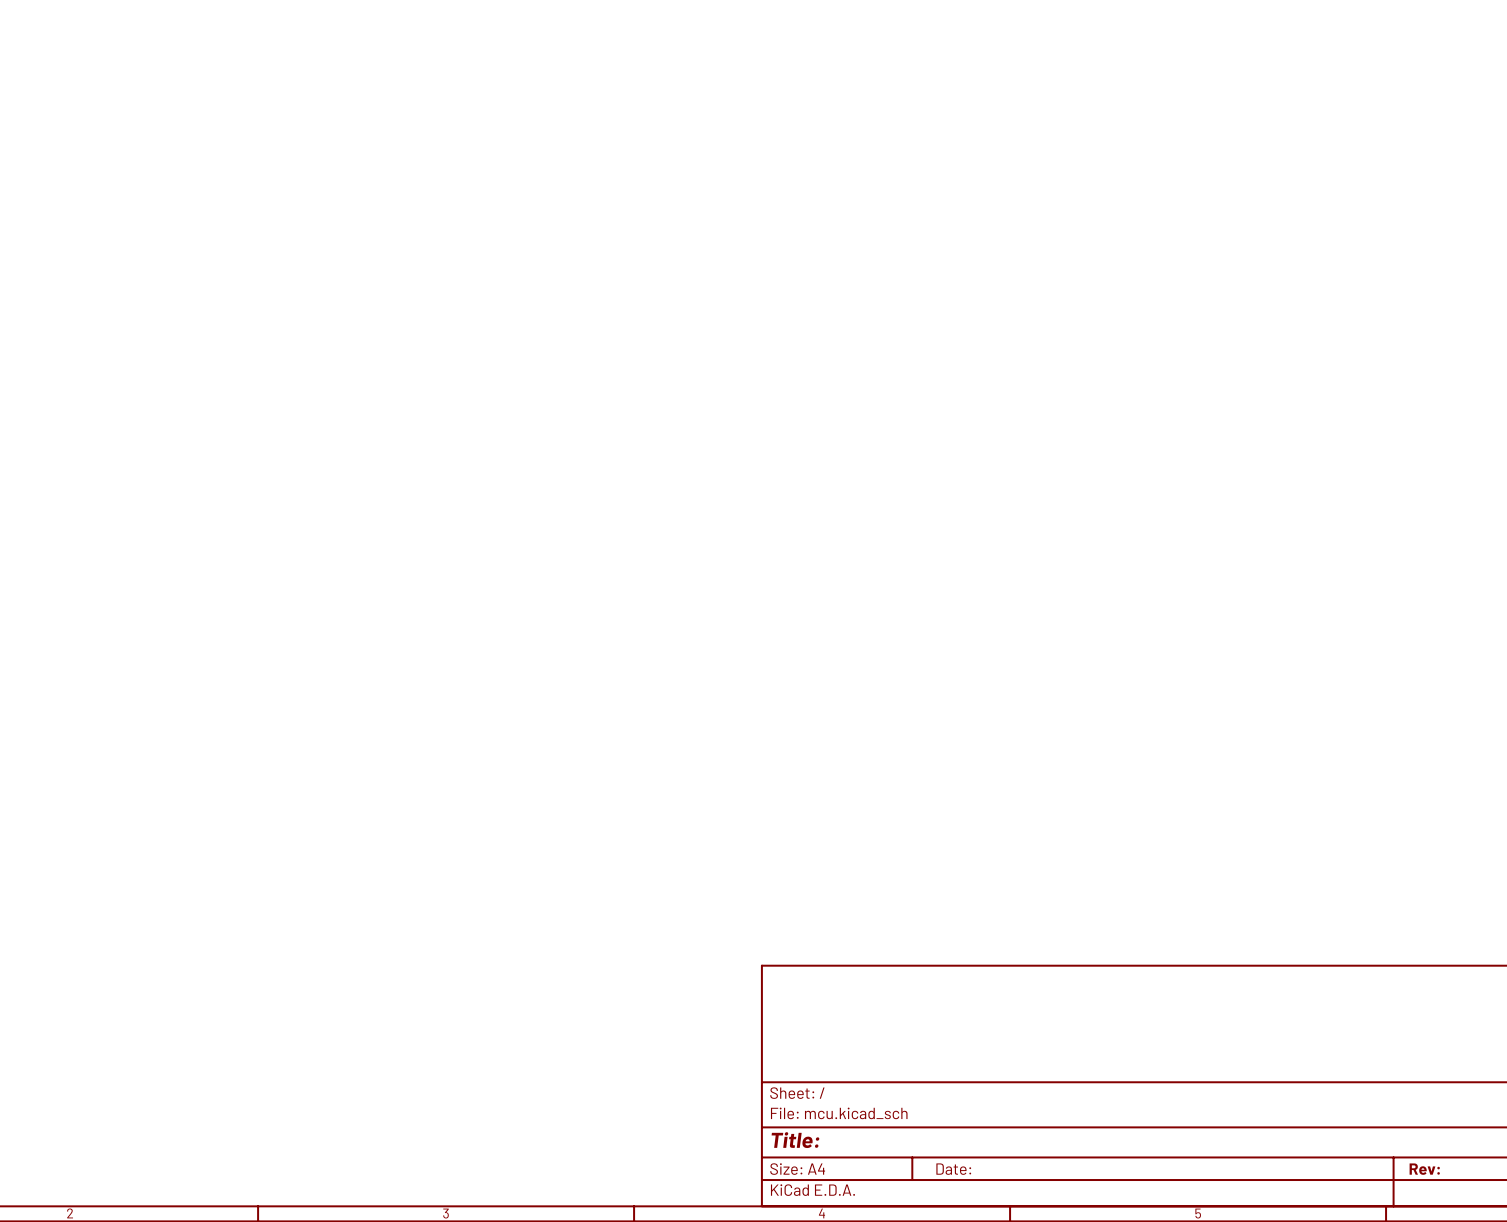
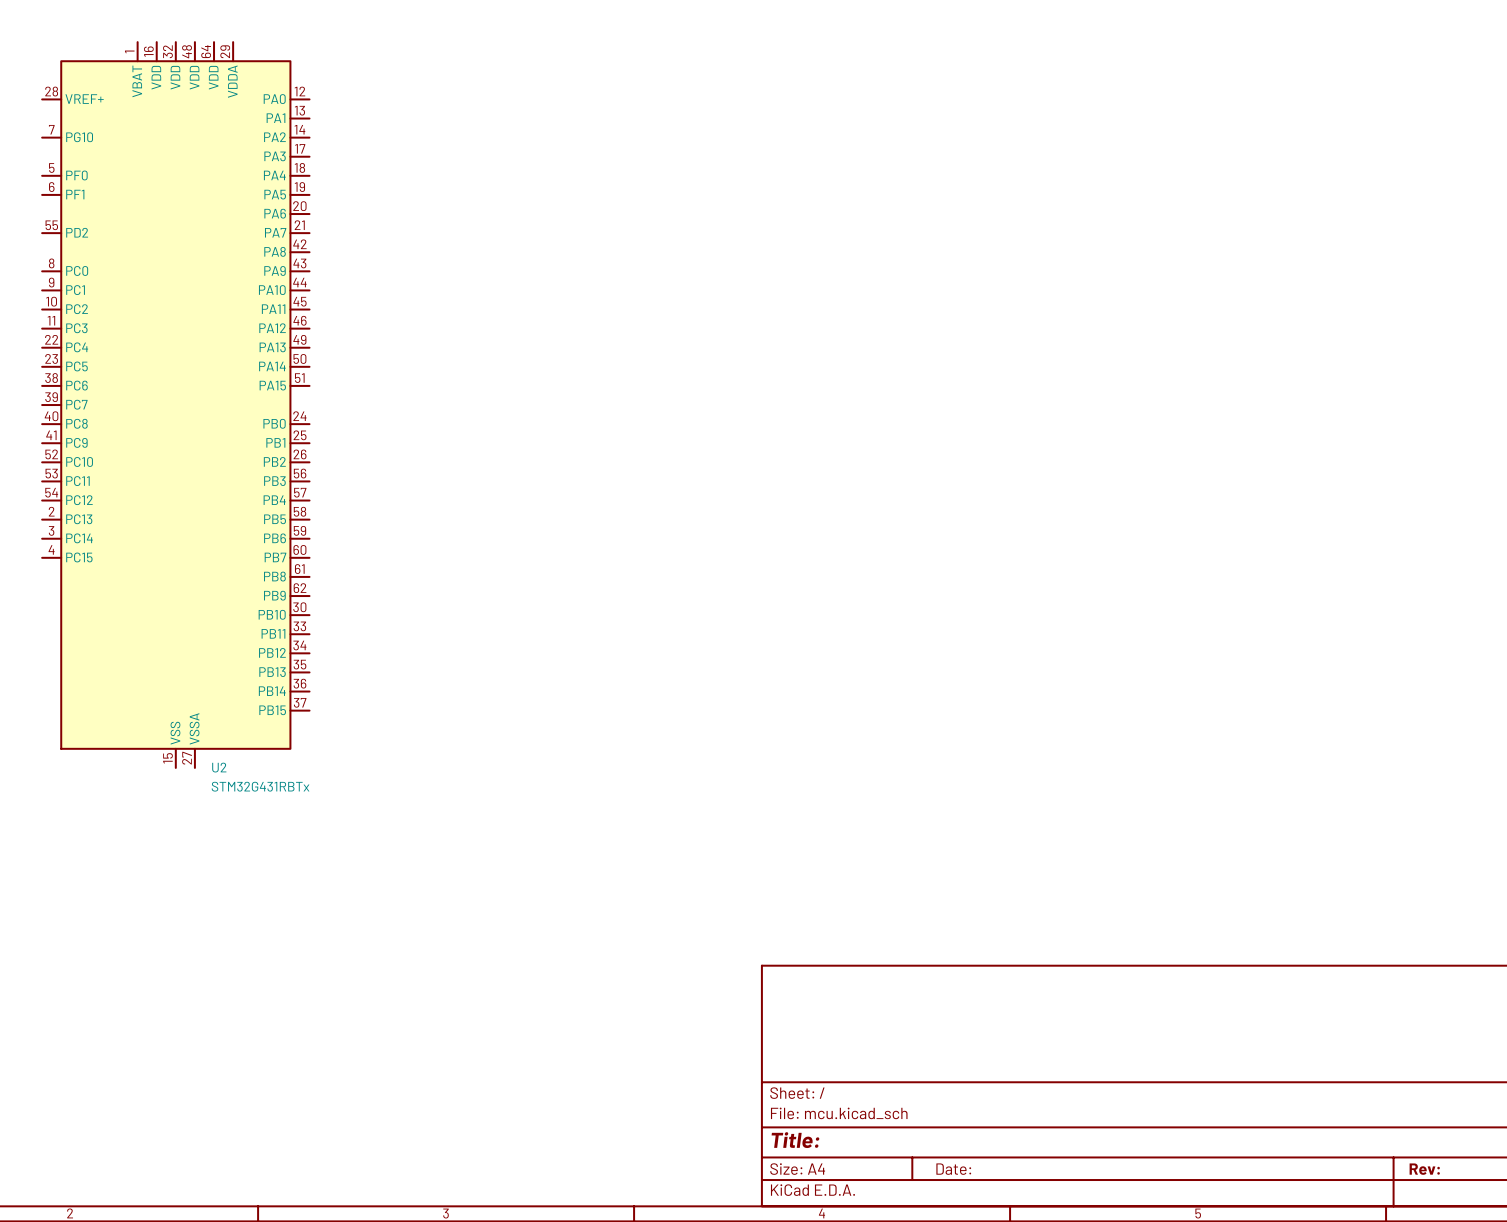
U2: none -> STM32G431RBTx (175, 405)

